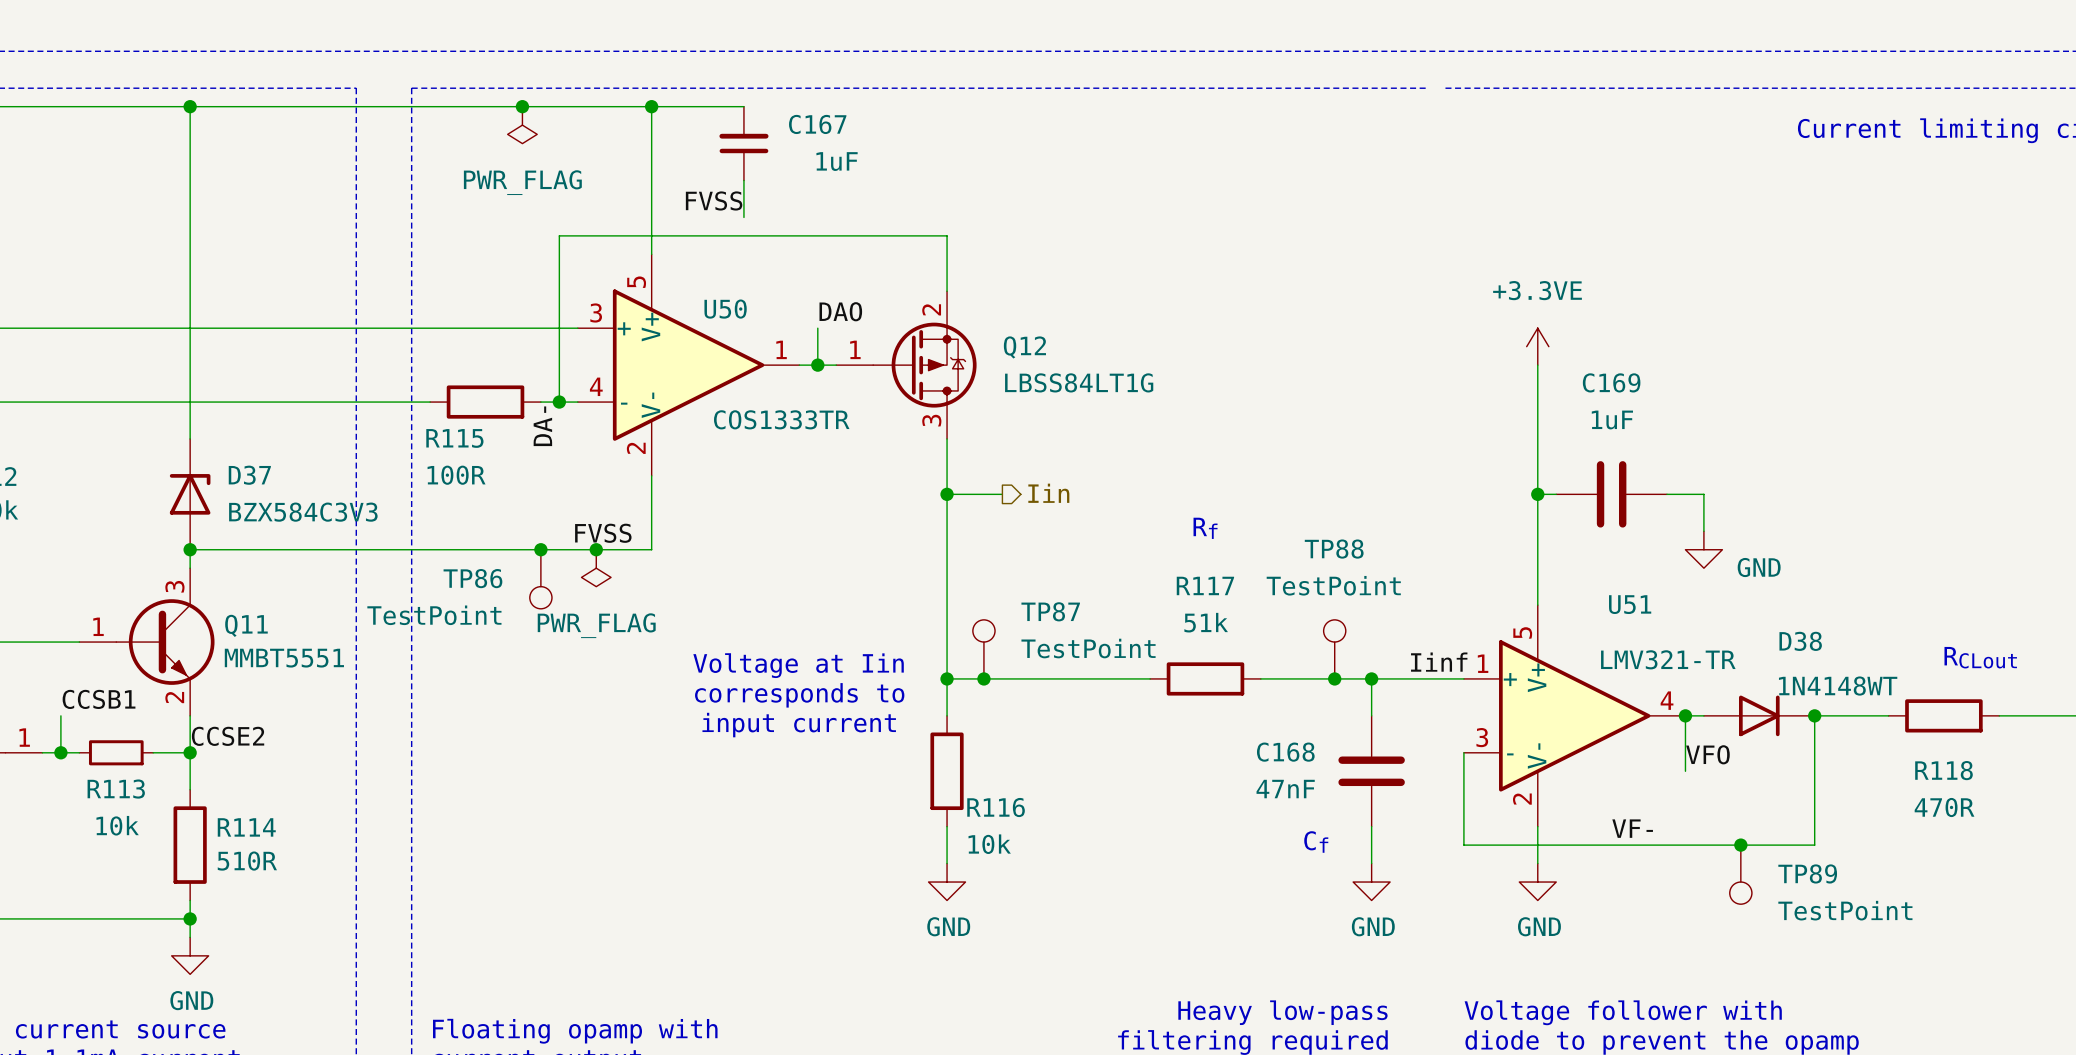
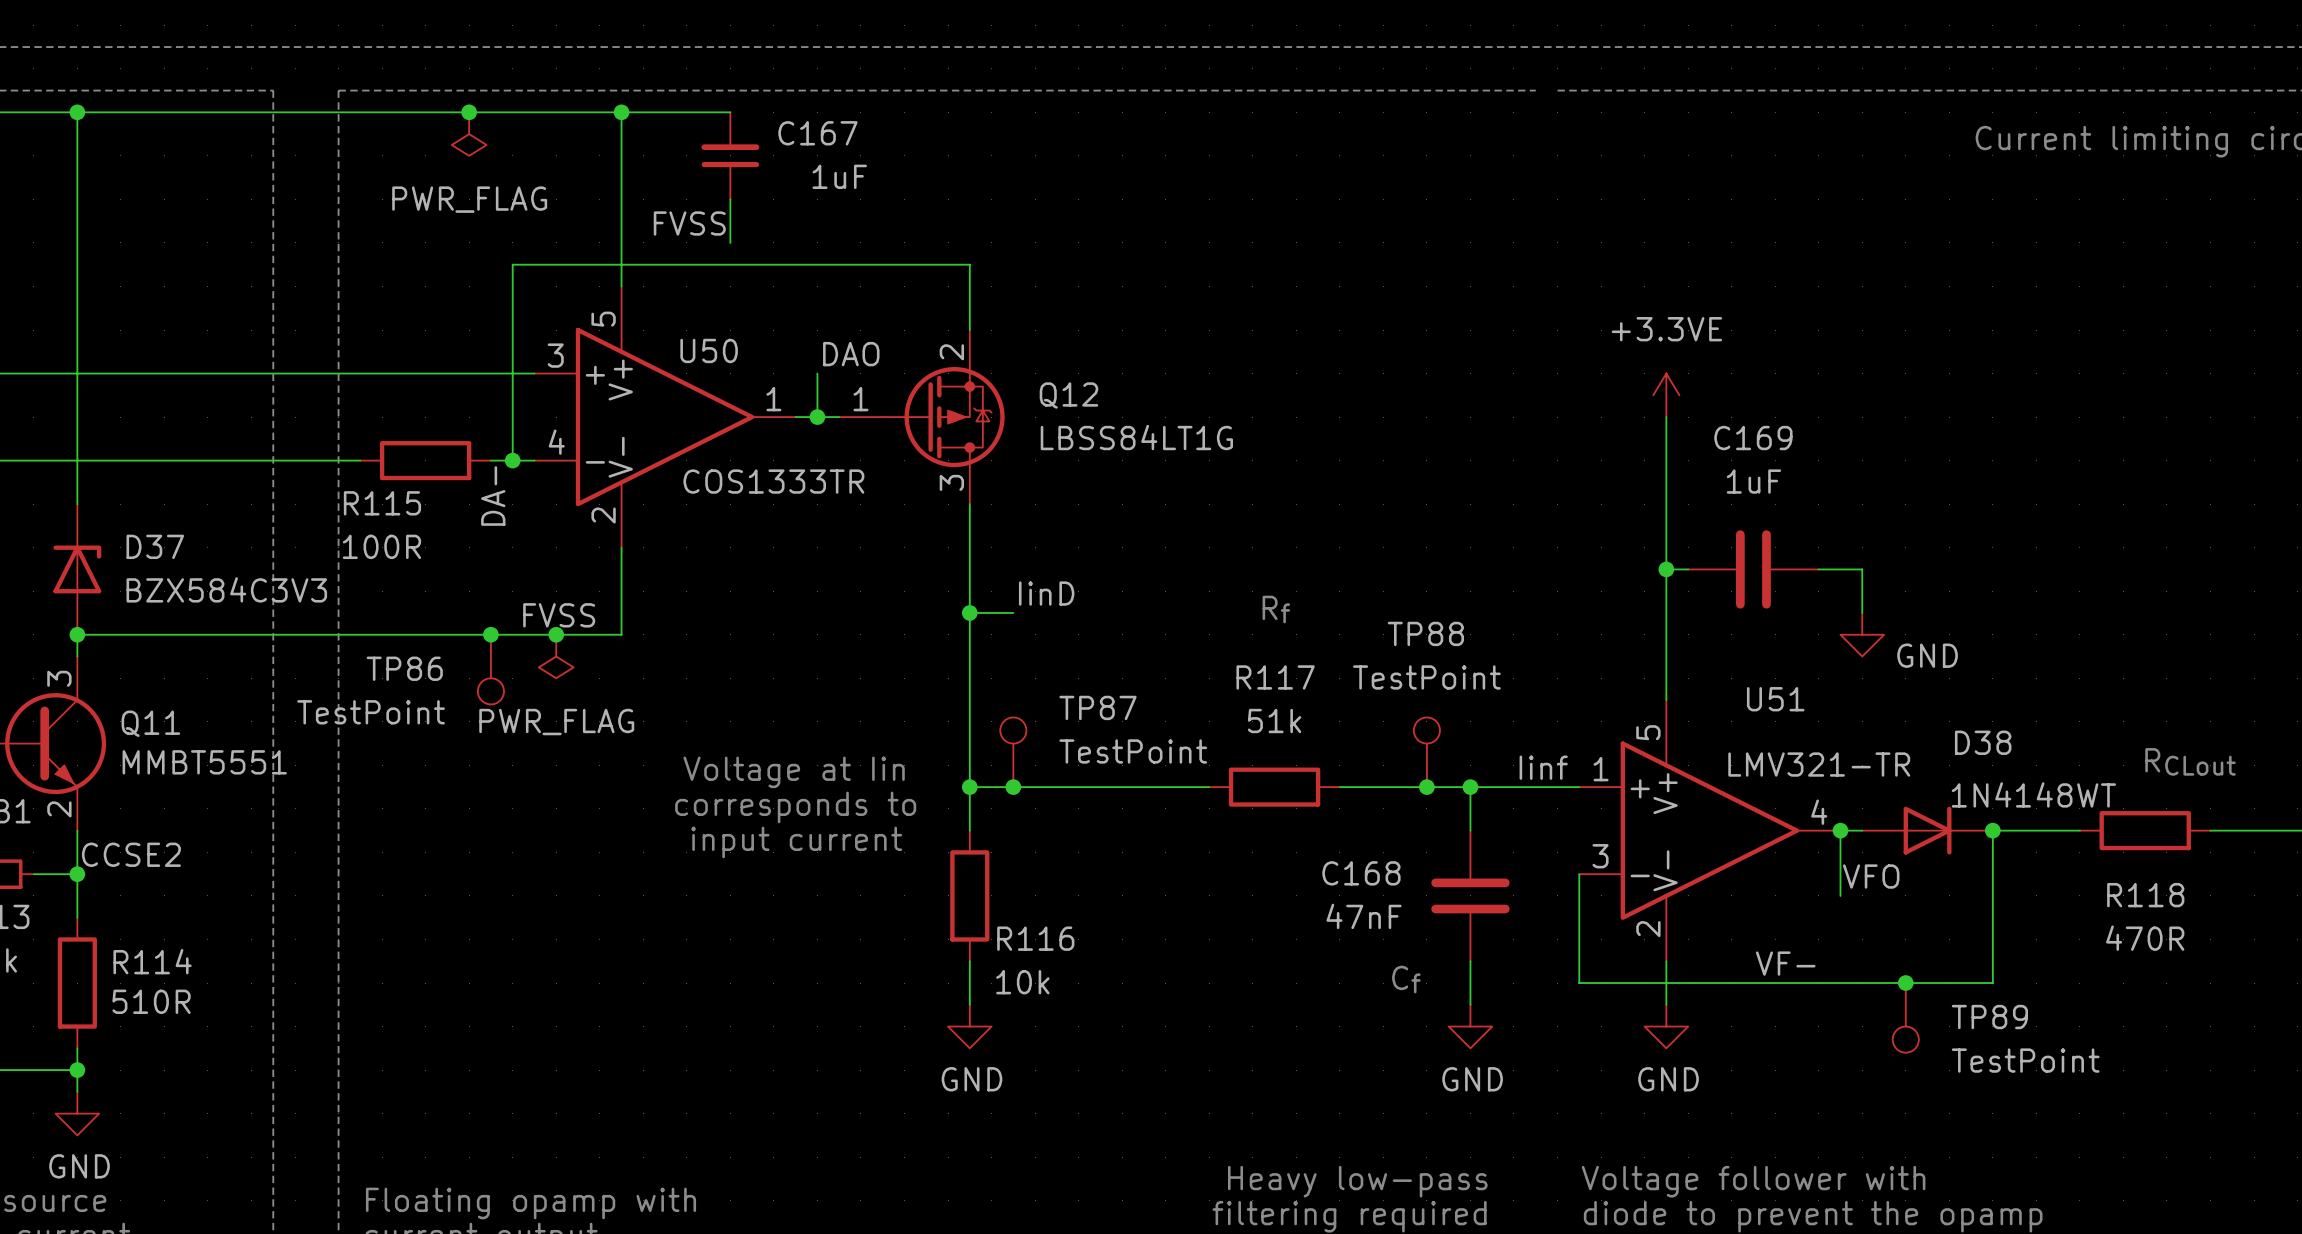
hierarchical label: Iin (1048, 493) -> none
wire: (947, 494) (1002, 494) -> none
junction position: (947, 494) -> (969, 612)
label: none -> IinD (1046, 593)
wire: none -> (969, 612) (1013, 612)

